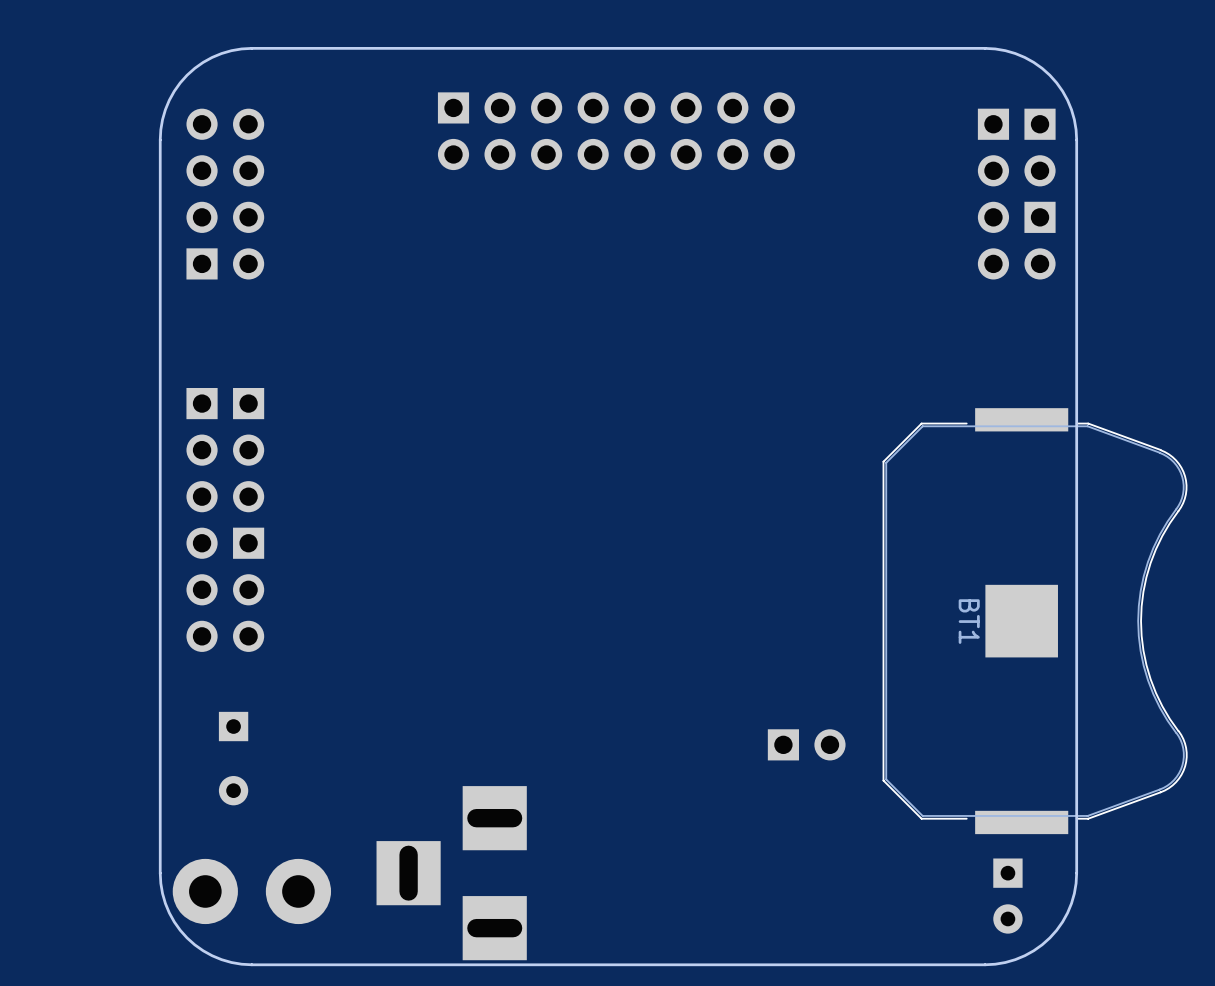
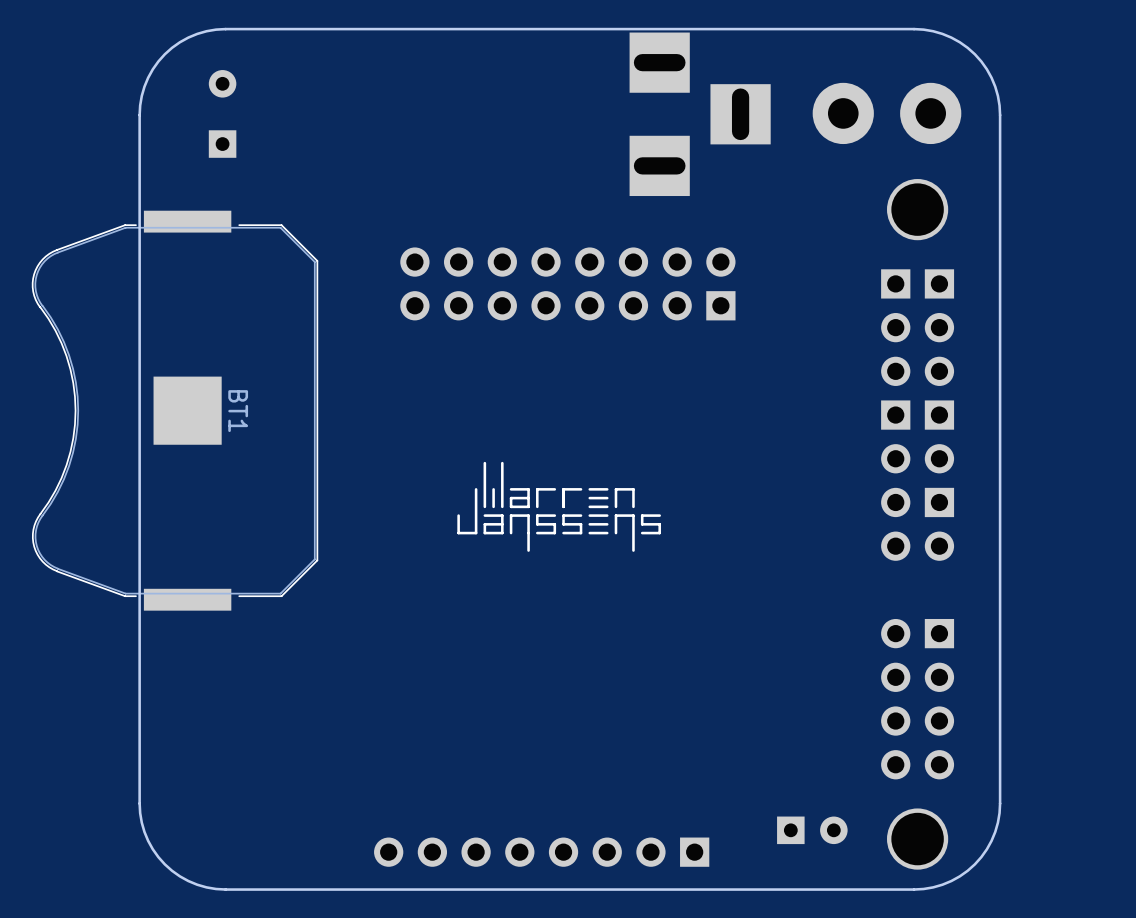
part rotation: 0° (616, 131) -> 180° (567, 283)
part: none -> (222, 113)
part: none -> (886, 113)
part: none -> (700, 114)
part: (993, 147) -> none
part: (1040, 147) -> none
part: (225, 194) -> none
part: none -> (917, 209)
part position: (1016, 240) -> (917, 524)
part: none -> (895, 327)
part: none -> (939, 327)
part: (248, 450) -> none
part: none -> (895, 436)
part: none -> (939, 436)
drawing: none -> [457, 461, 661, 552]
part: (202, 519) -> none
part: (248, 589) -> none
BT1 rotation: 0° (1035, 621) -> 180° (175, 410)
BT1 position: (1035, 621) -> (175, 410)
part: (806, 744) -> none
part: (233, 758) -> none
part: none -> (917, 699)
part: (451, 873) -> none
part: (251, 891) -> none
part rotation: 0° (1007, 896) -> 90° counterclockwise (812, 830)
part position: (1007, 896) -> (812, 830)
part: none -> (917, 839)
part: none -> (541, 852)

